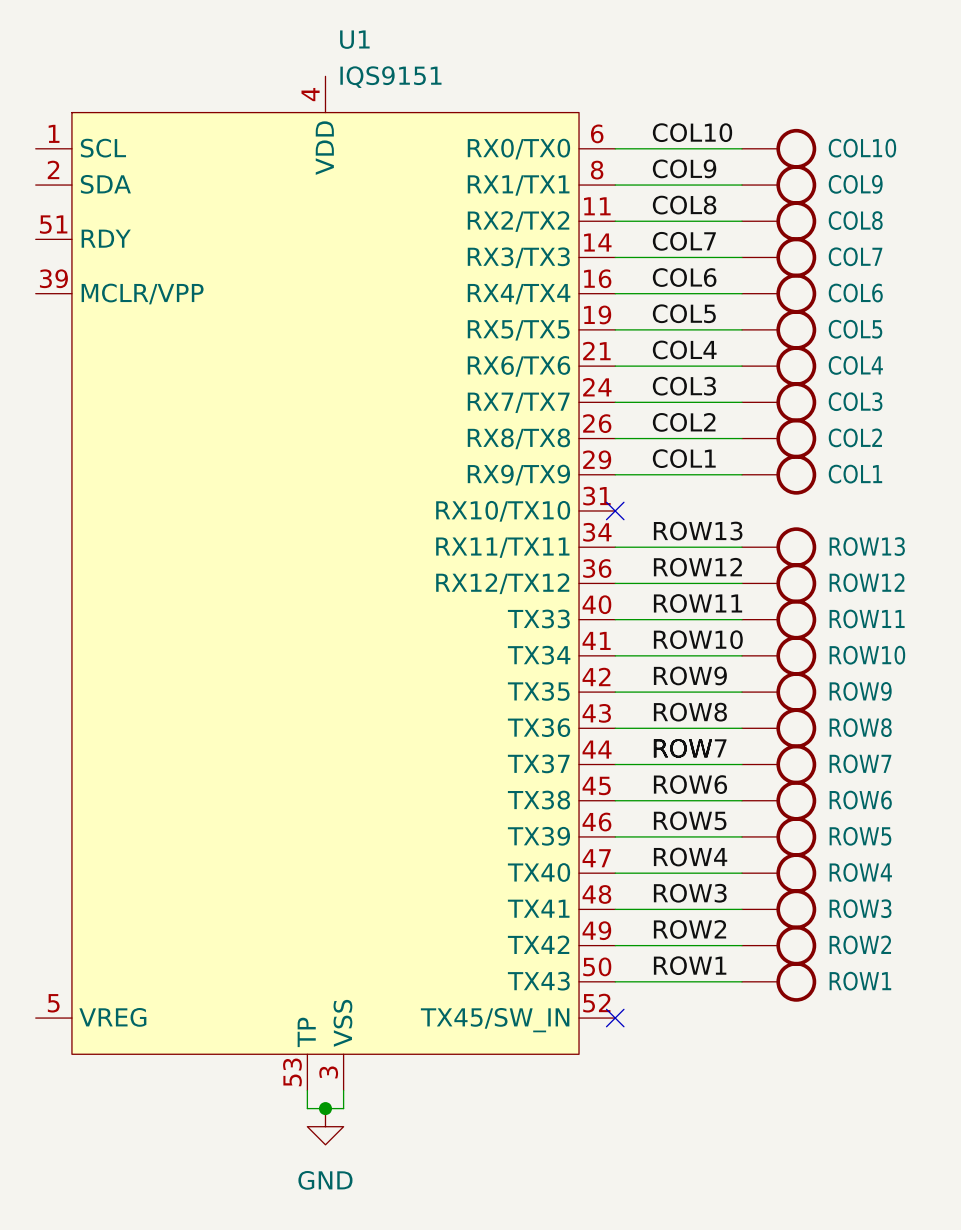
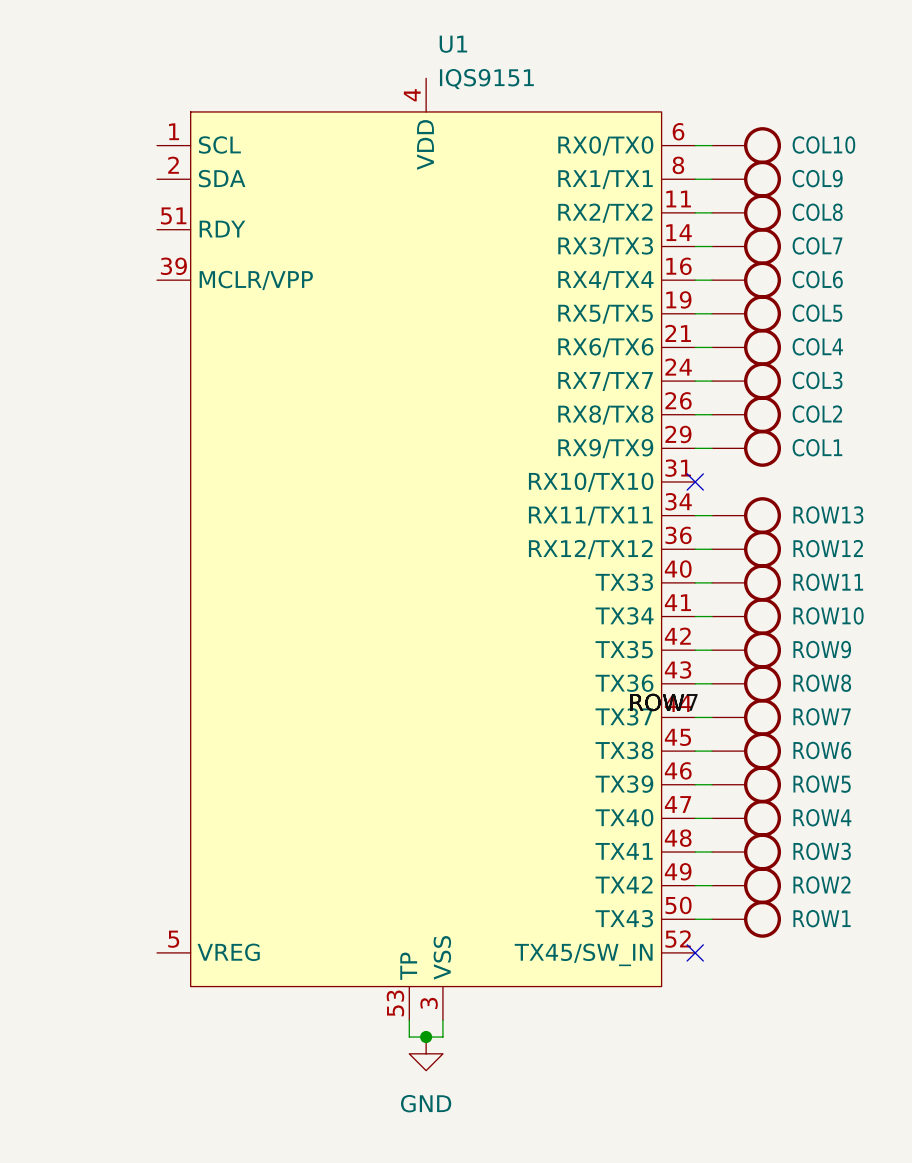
label: COL10 (692, 132) -> none
label: COL9 (684, 168) -> none
label: COL8 (684, 205) -> none
label: COL7 (684, 241) -> none
label: COL6 (684, 277) -> none
label: COL5 (684, 313) -> none
label: COL4 (684, 349) -> none
label: COL3 (684, 386) -> none
label: COL2 (684, 422) -> none
label: COL1 (684, 458) -> none
no-connect mark: (615, 510) -> none
no-connect mark: none -> (695, 481)
label: ROW13 (698, 531) -> none
label: ROW12 (697, 567) -> none
U1 position: (325, 583) -> (426, 549)
label: ROW11 (698, 603) -> none
label: ROW10 (698, 639) -> none
label: ROW9 (690, 675) -> none
label: ROW8 (690, 712) -> none
label: ROW6 (690, 784) -> none
label: ROW5 (690, 820) -> none
label: ROW4 (690, 857) -> none
label: ROW3 (690, 893) -> none
label: ROW2 (690, 929) -> none
label: ROW1 (690, 965) -> none
no-connect mark: (615, 1018) -> none
no-connect mark: none -> (695, 952)
wire: (307, 1090) (307, 1108) (343, 1108) (343, 1090) -> (409, 1020) (409, 1037) (442, 1037) (442, 1020)
junction: (325, 1108) -> none
junction: none -> (426, 1037)
power symbol position: GND (325, 1126) -> GND (426, 1053)

